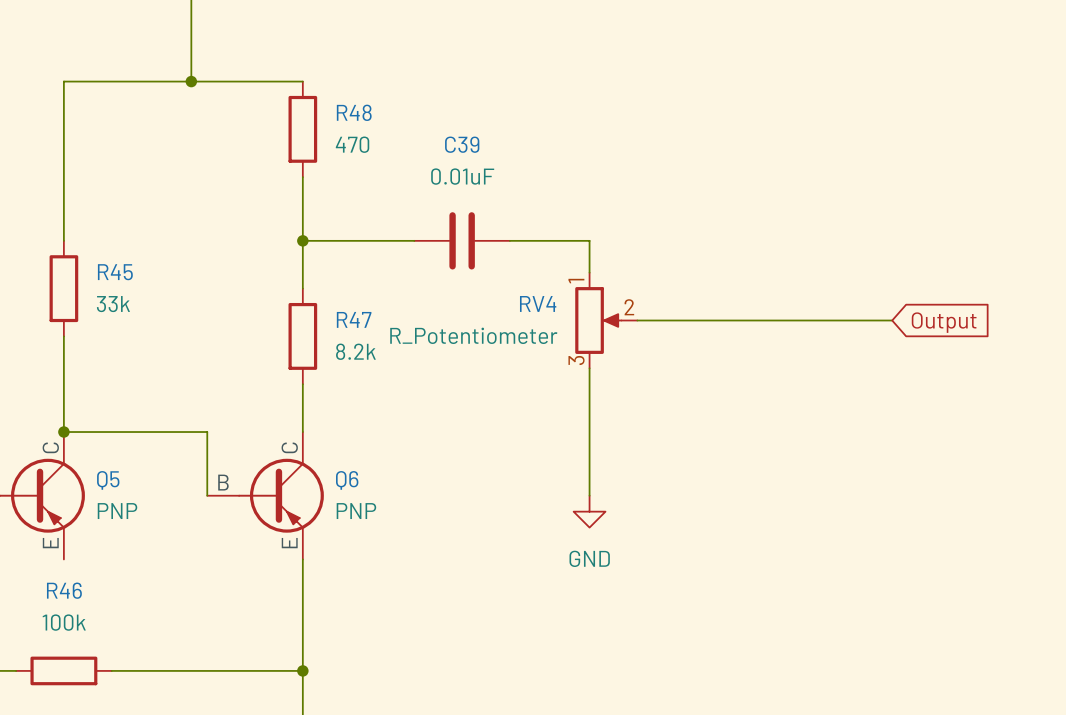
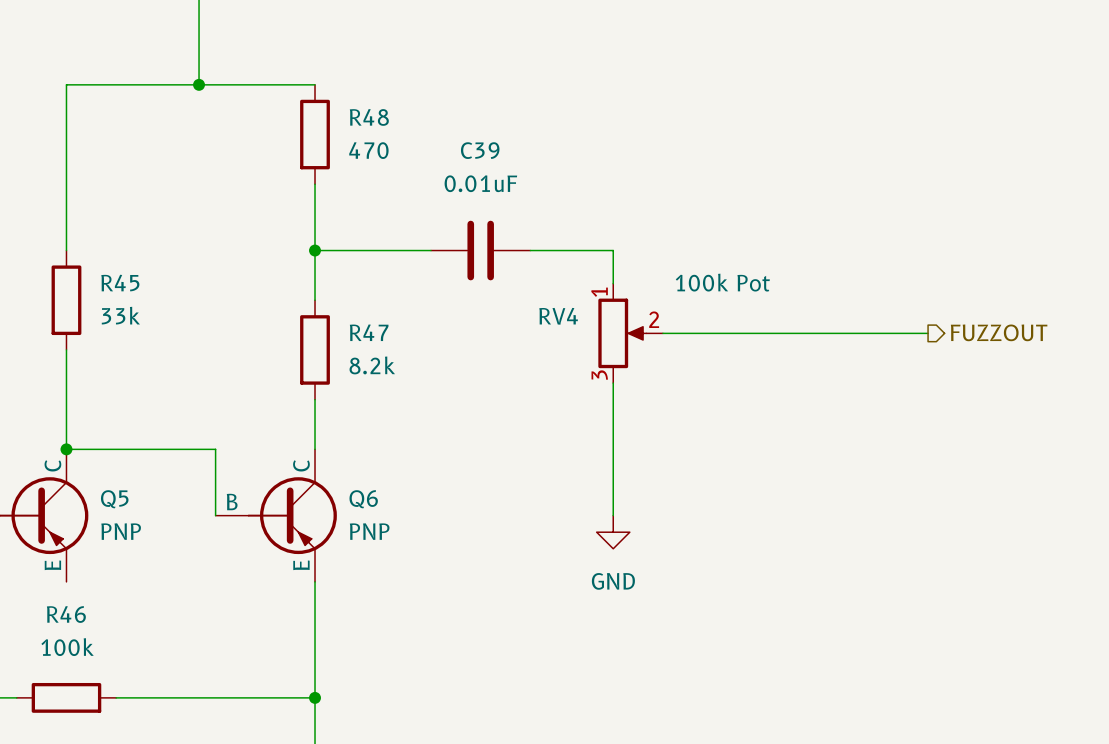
hierarchical label: none -> FUZZOUT (999, 332)
global label: Output (944, 322) -> none
RV4 value: R_Potentiometer (473, 335) -> 100k Pot (722, 282)

